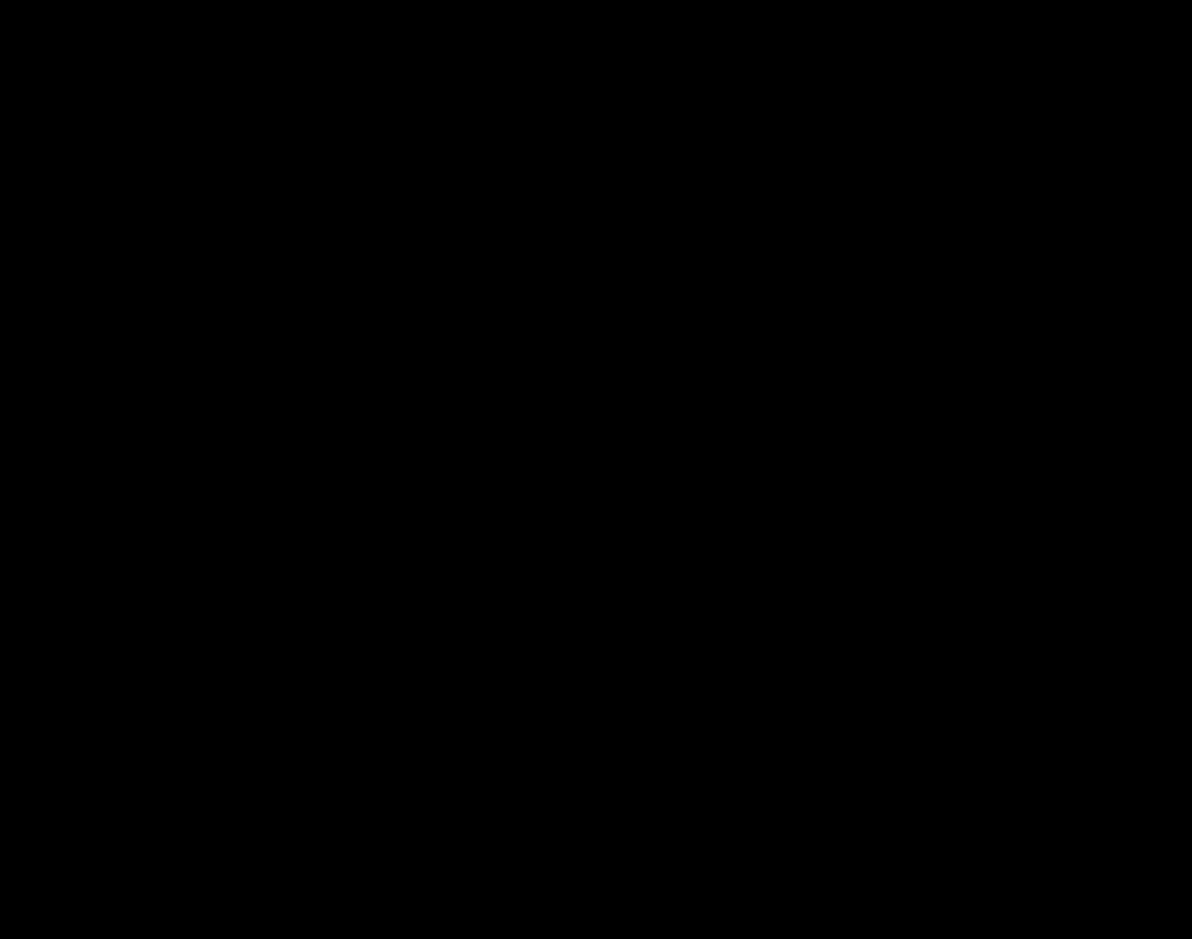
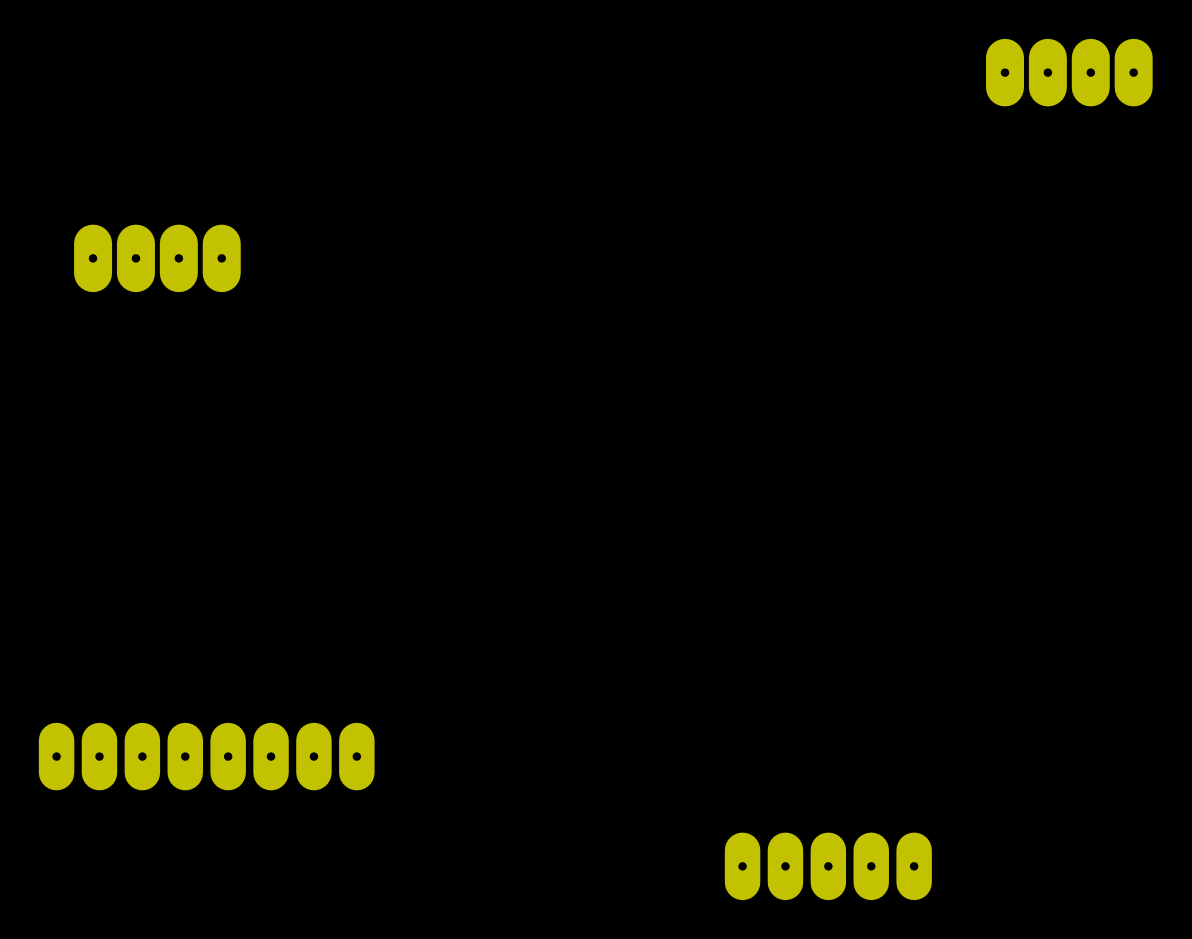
part: none -> (1069, 72)
part: none -> (157, 258)
part: none -> (206, 756)
part: none -> (828, 866)

